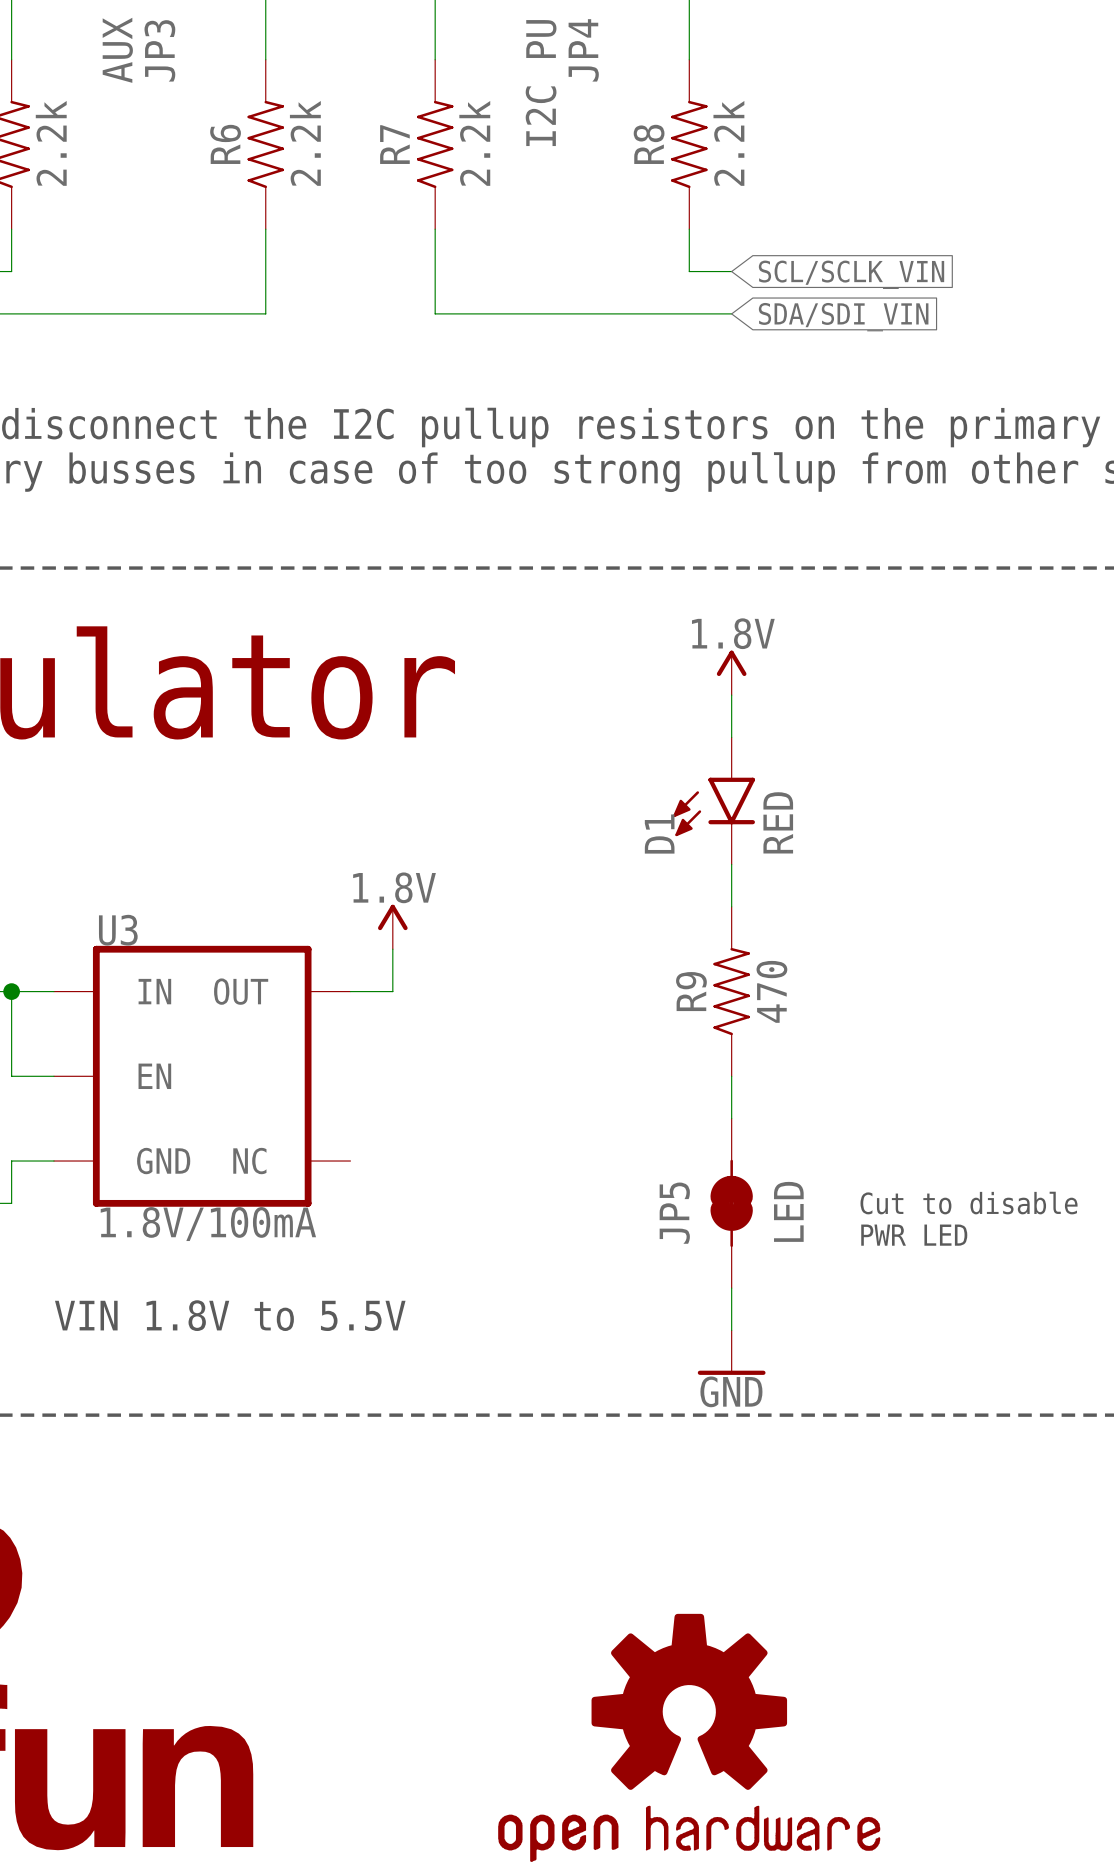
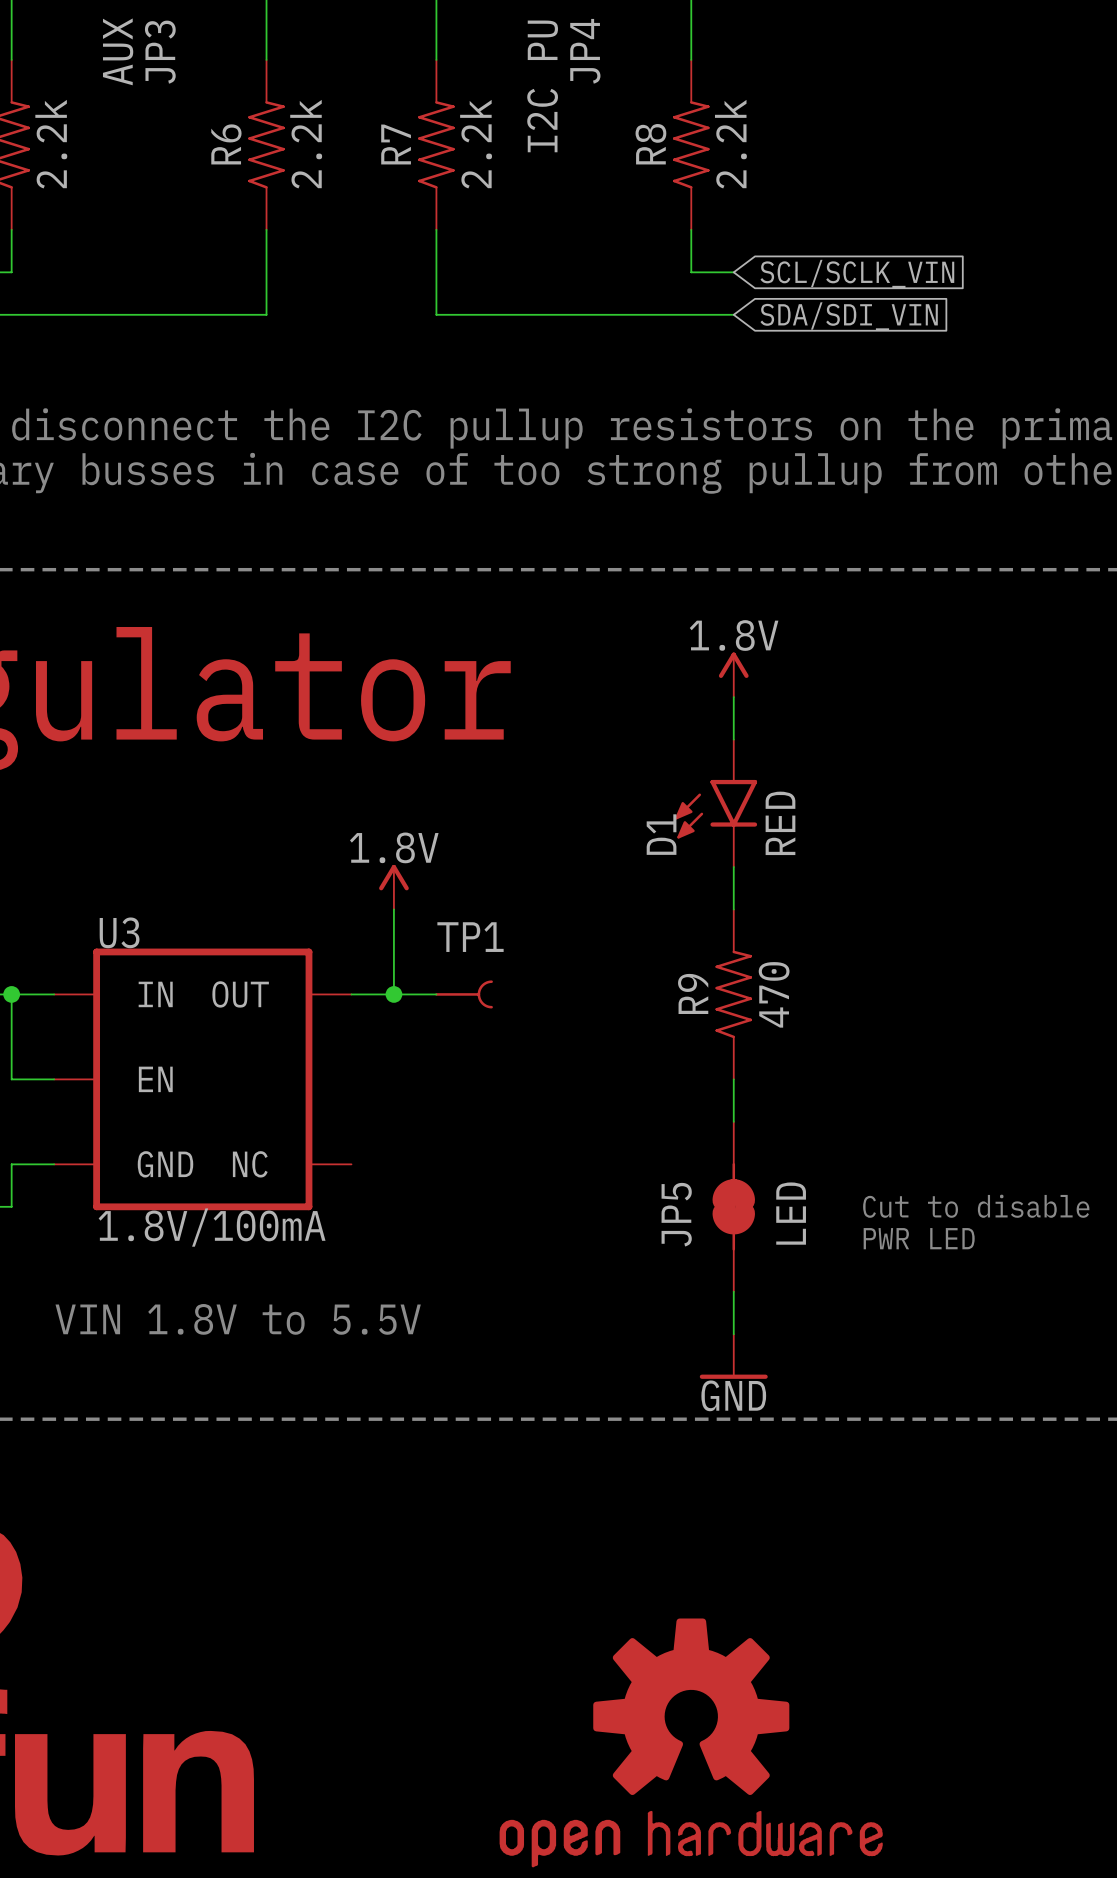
power symbol position: 1.8V (392, 927) -> 1.8V (393, 887)
wire: none -> (393, 994) (436, 994)
junction: none -> (393, 994)
TP1: none -> (464, 994)

